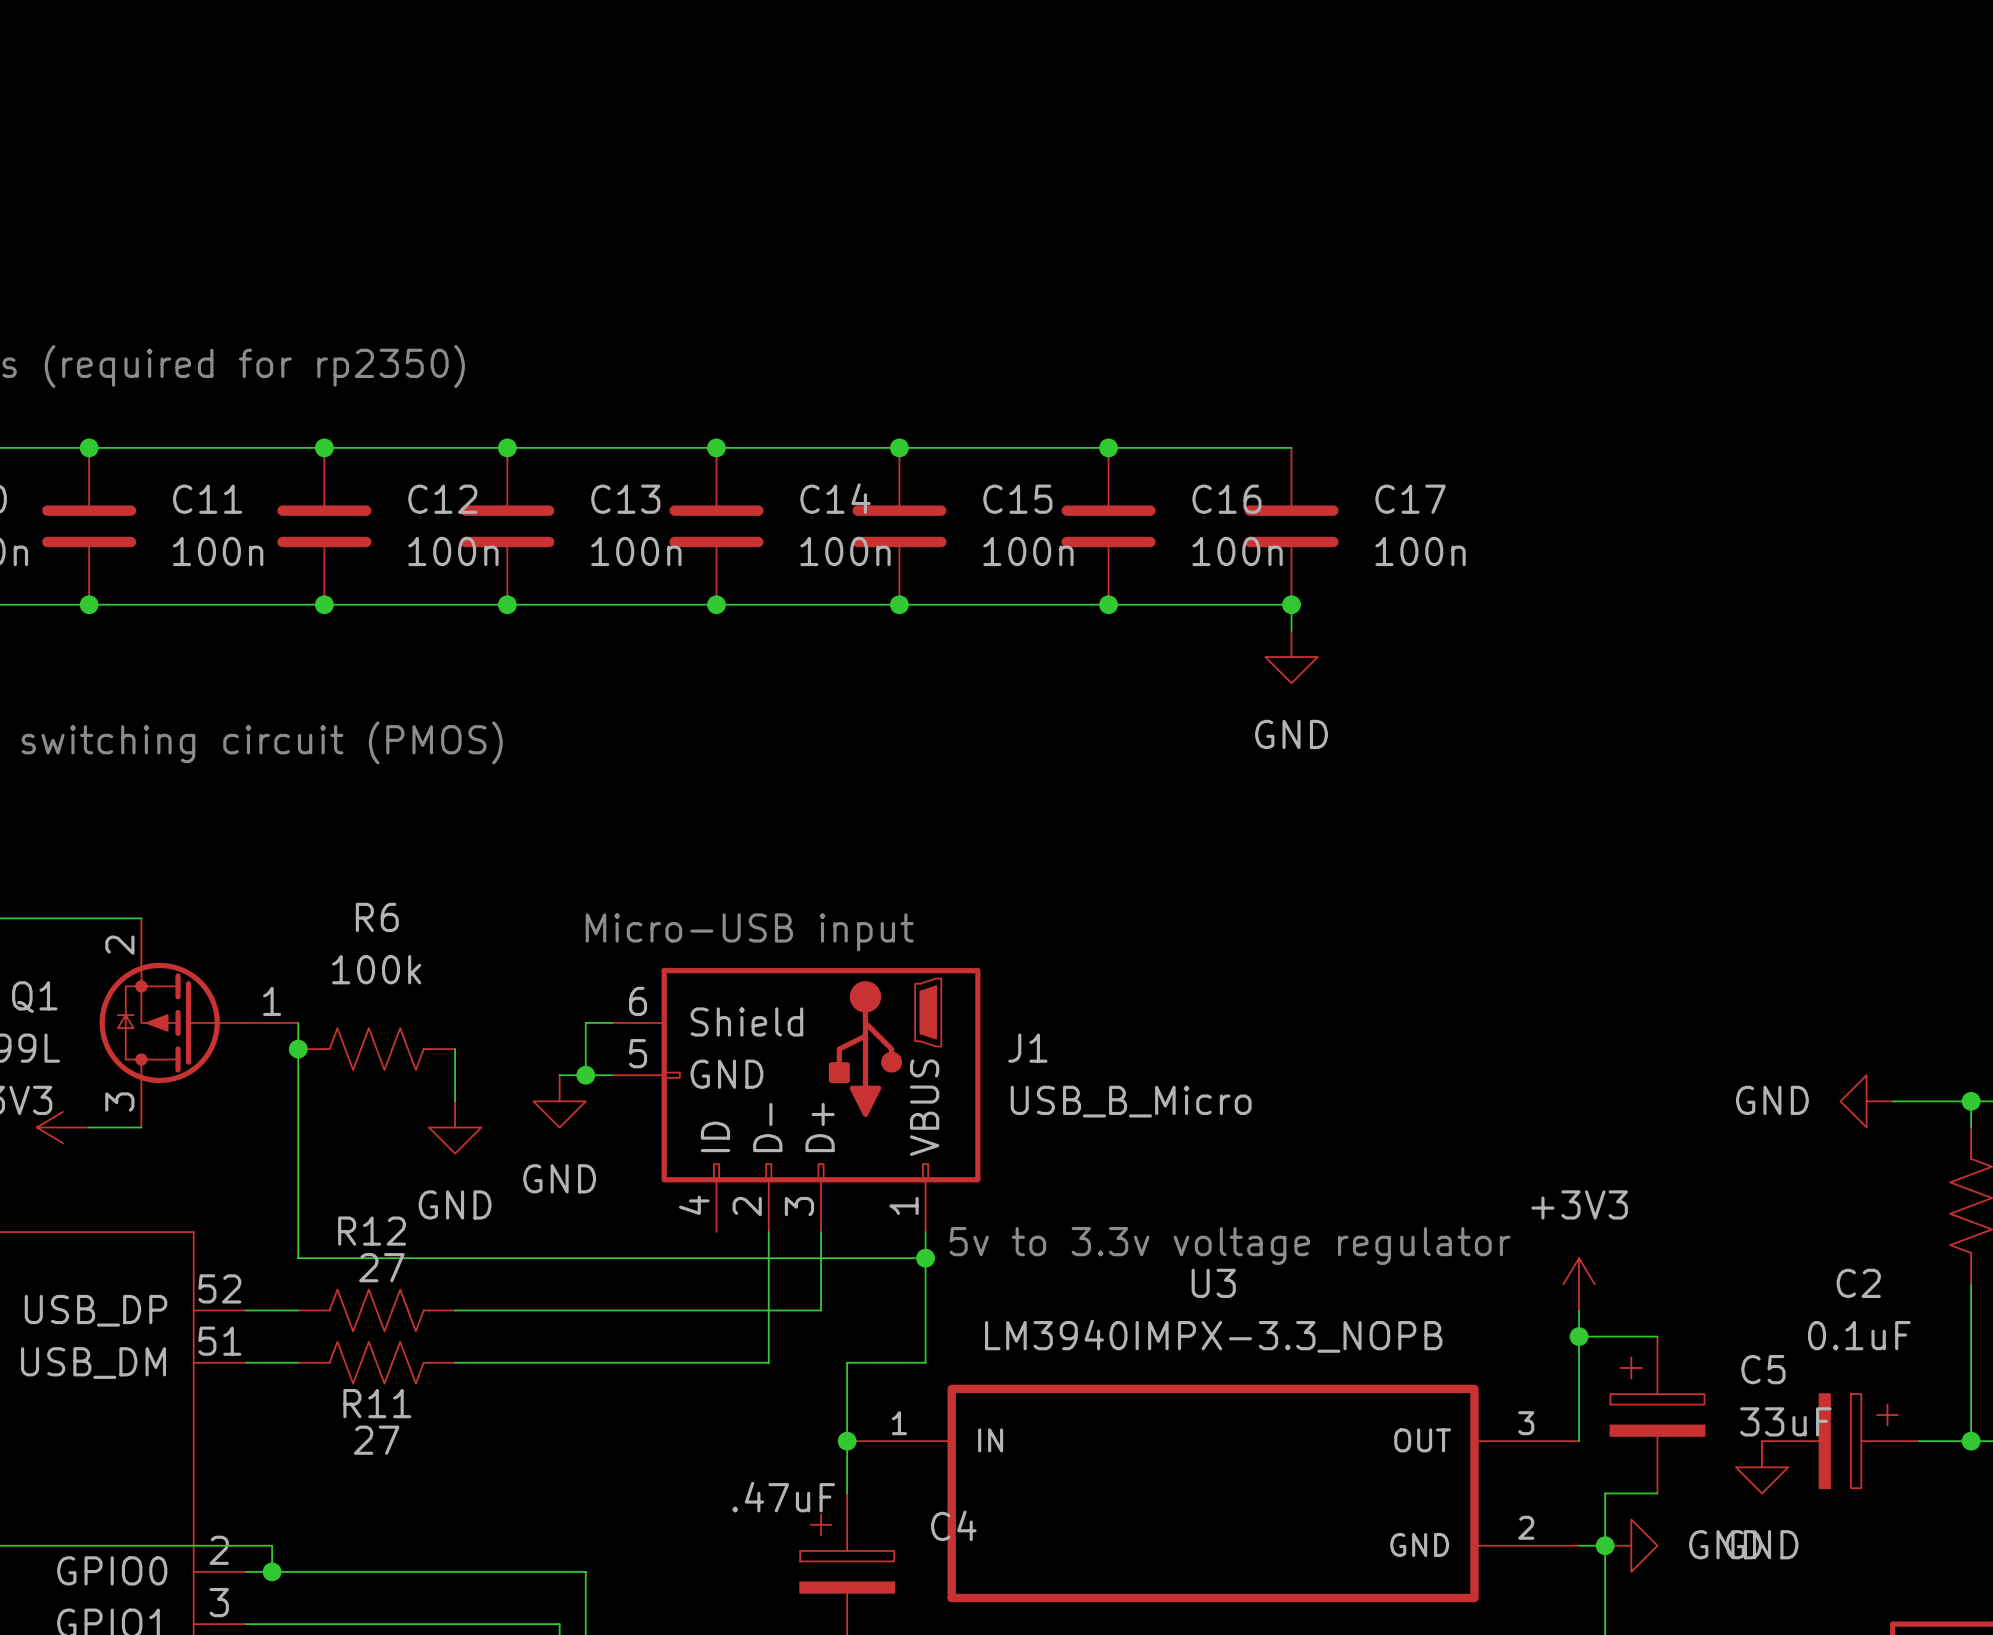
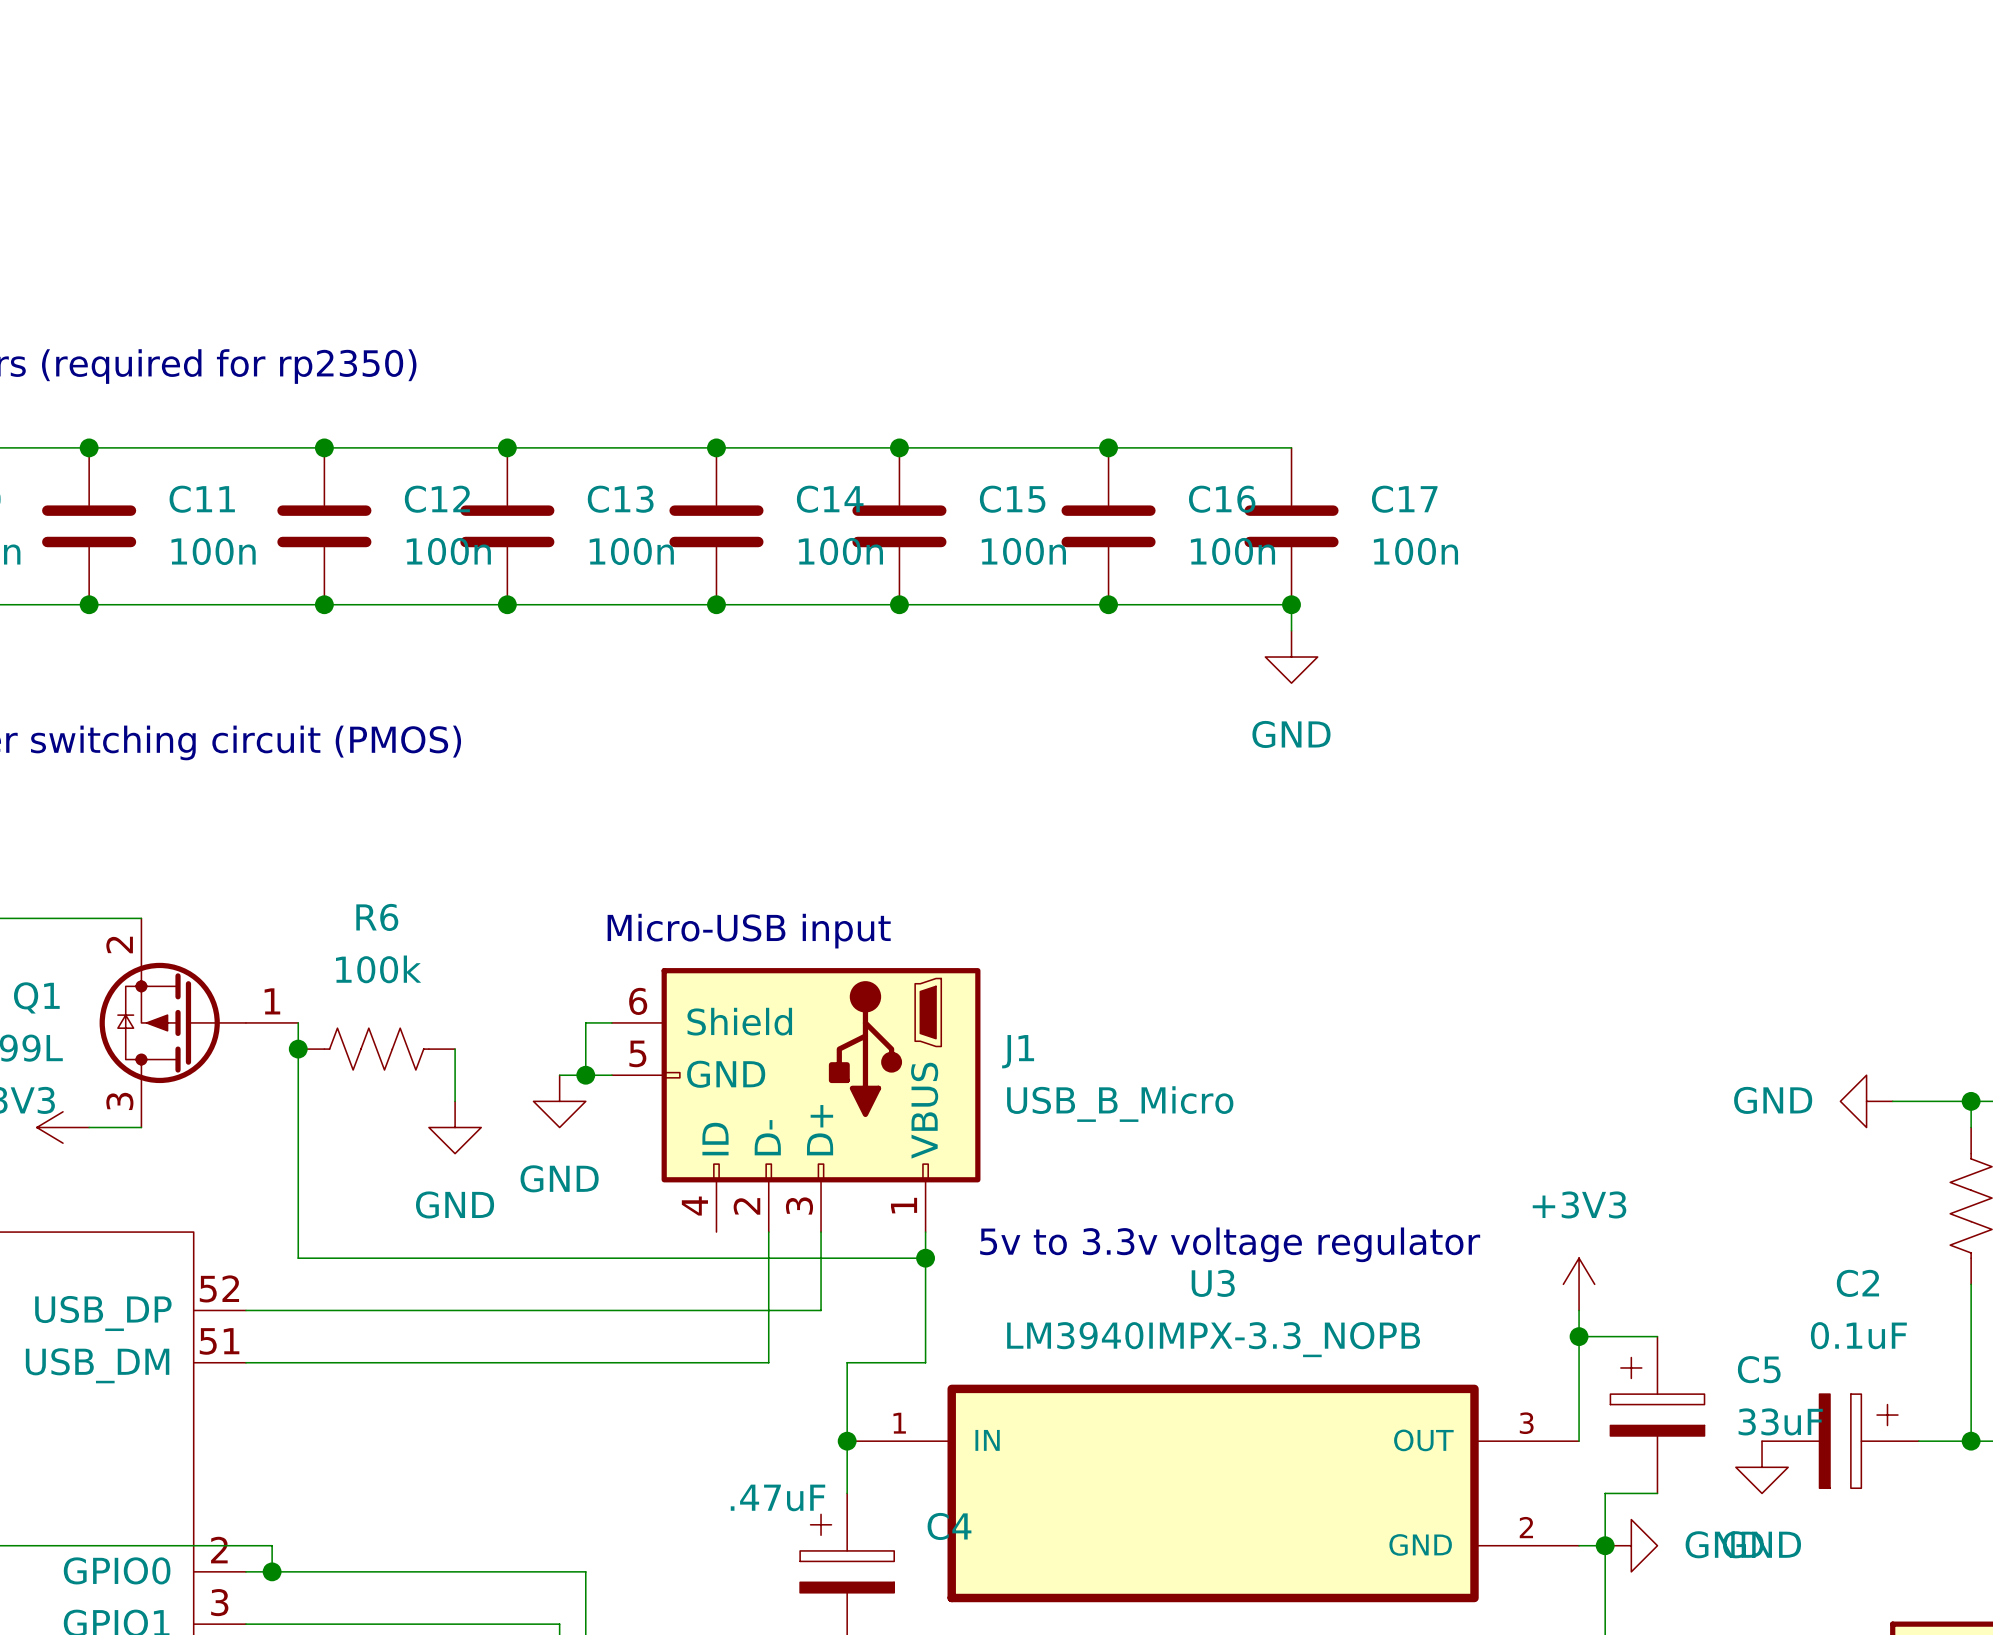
wire: none -> (298, 1310) (455, 1310)
R12: 27 (376, 1310) -> none
wire: none -> (298, 1362) (455, 1362)
R11: 27 (376, 1362) -> none

